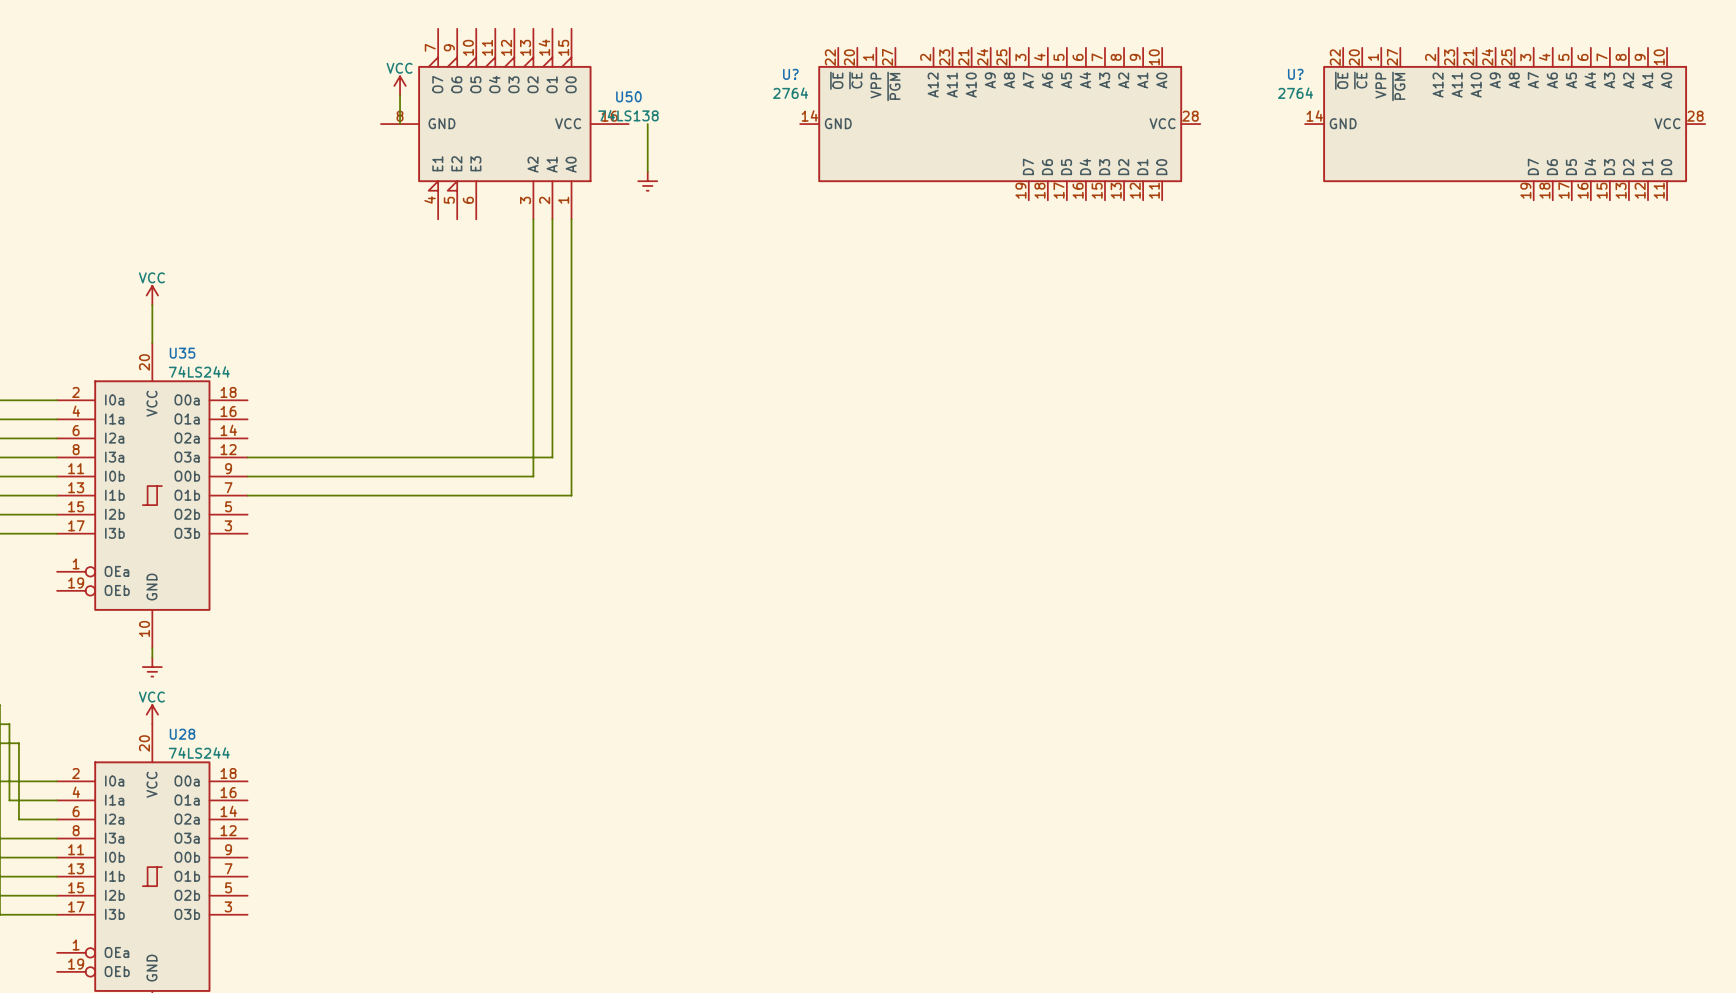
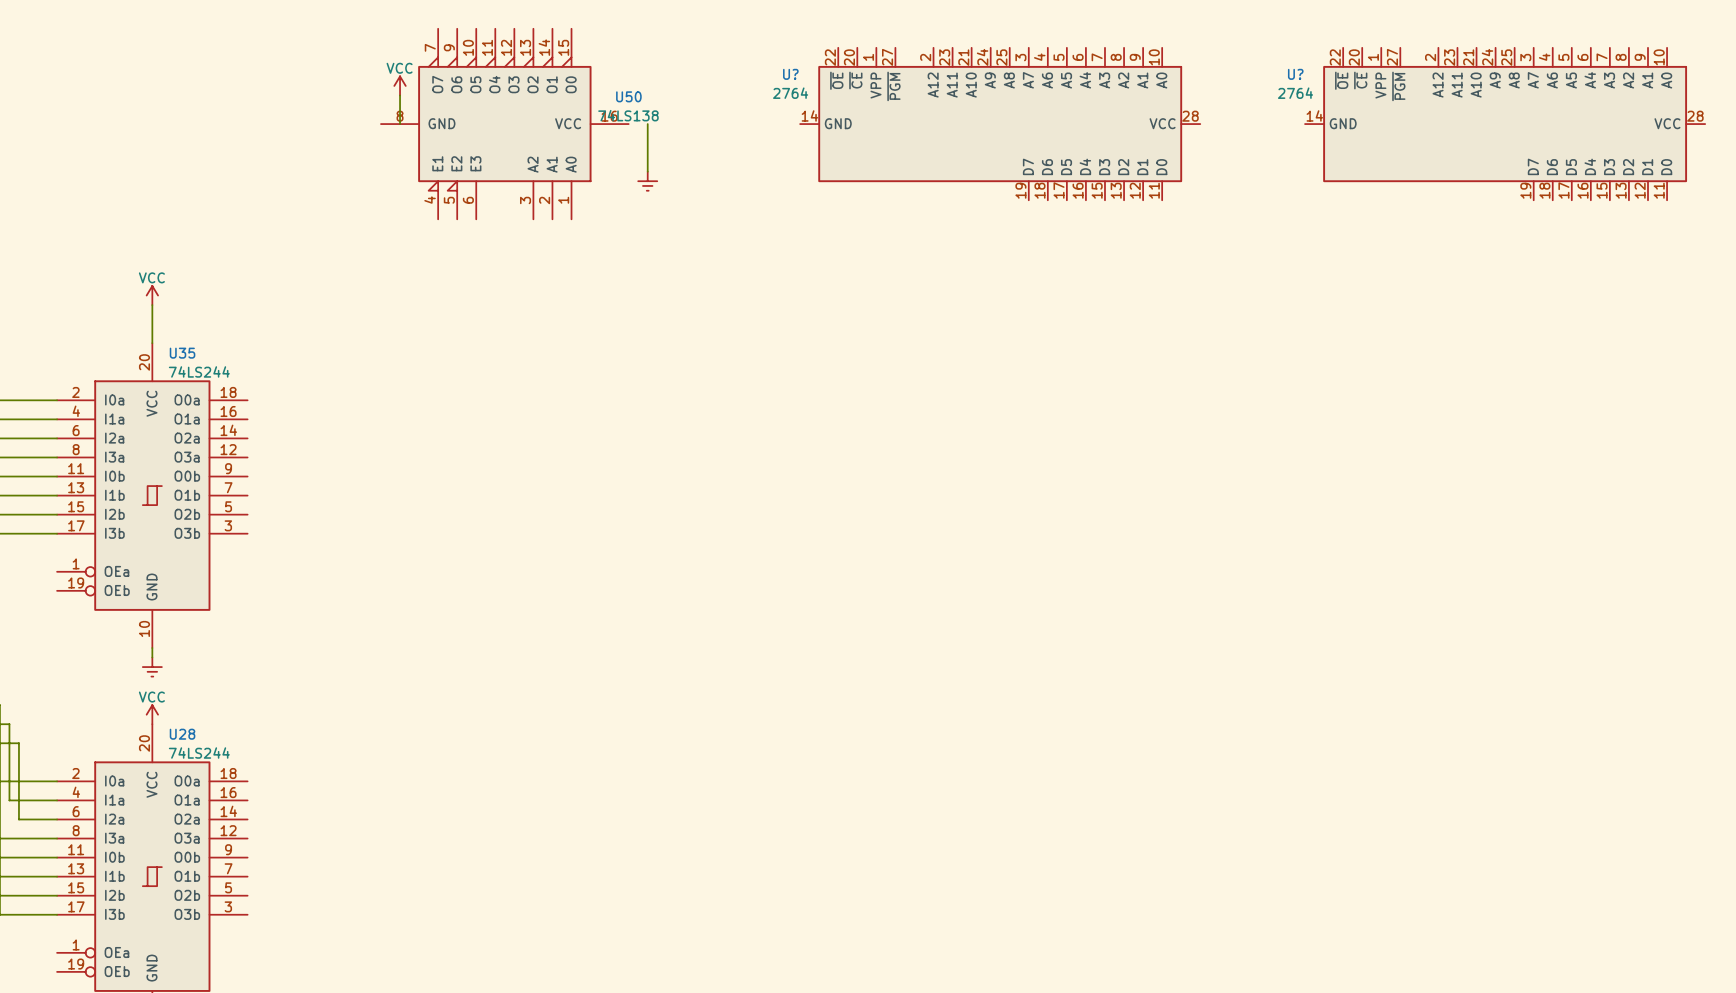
wire: (533, 219) (533, 476) (247, 476) -> none
wire: (552, 219) (552, 457) (247, 457) -> none
wire: (571, 219) (571, 495) (247, 495) -> none

